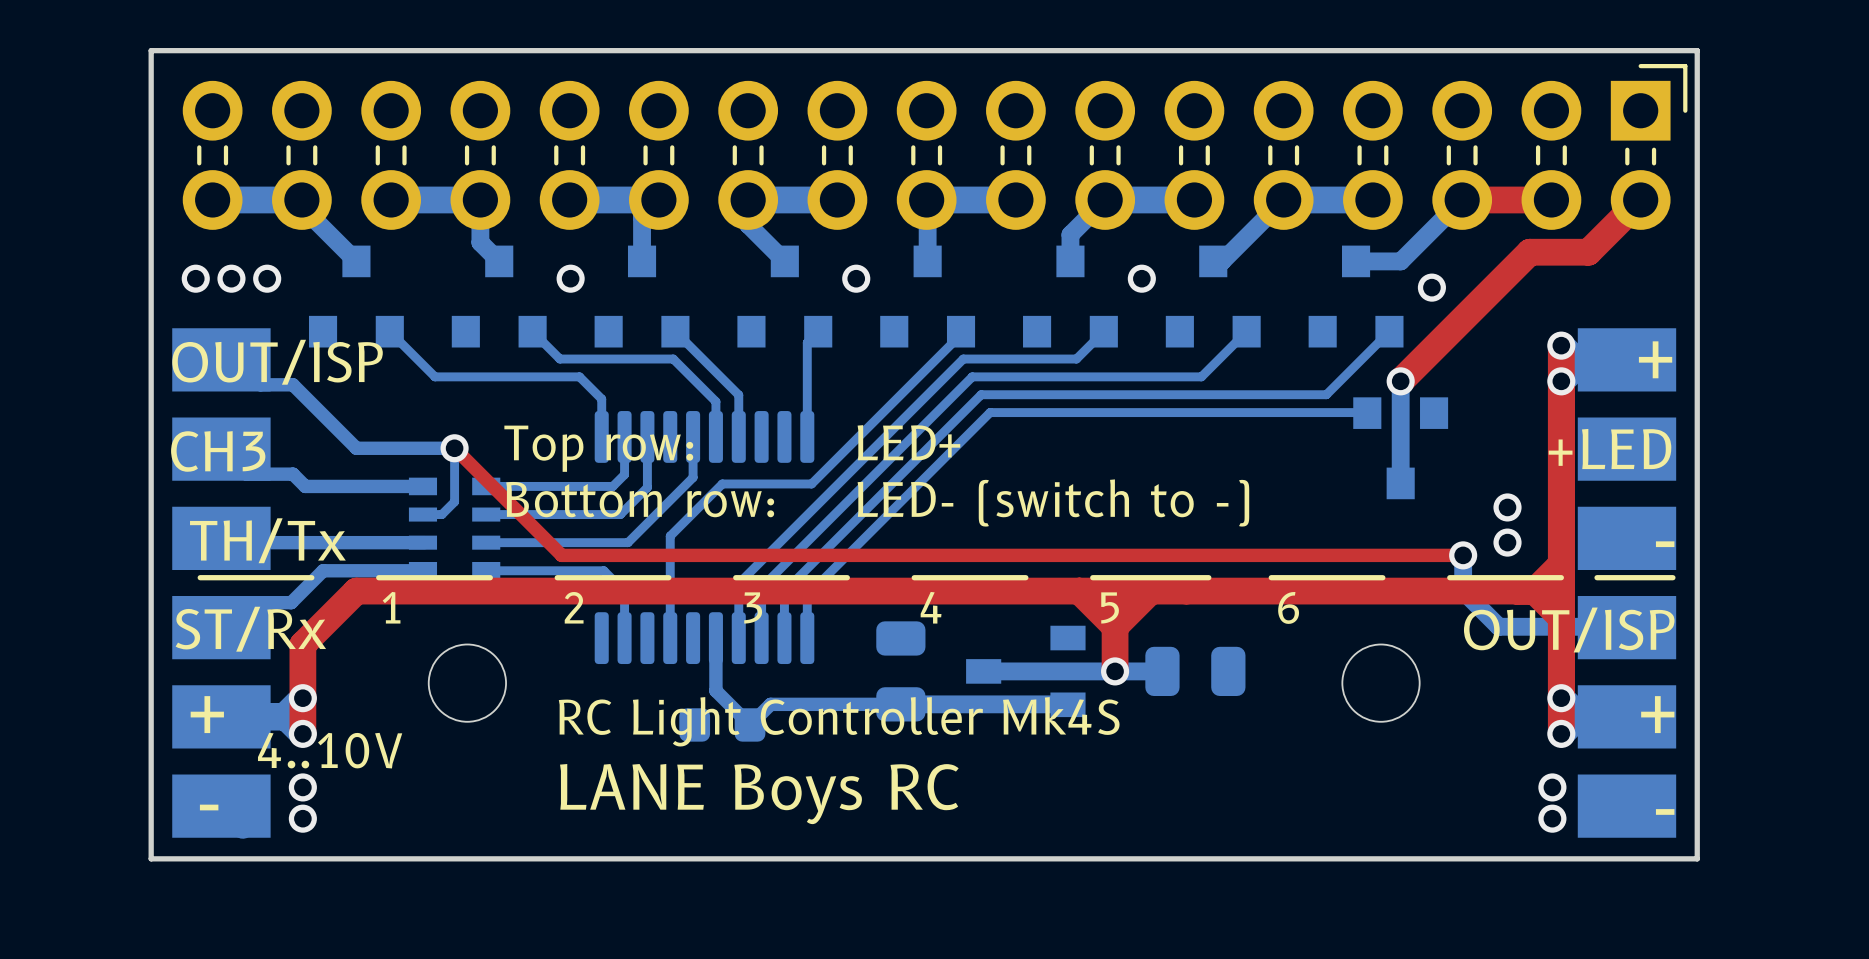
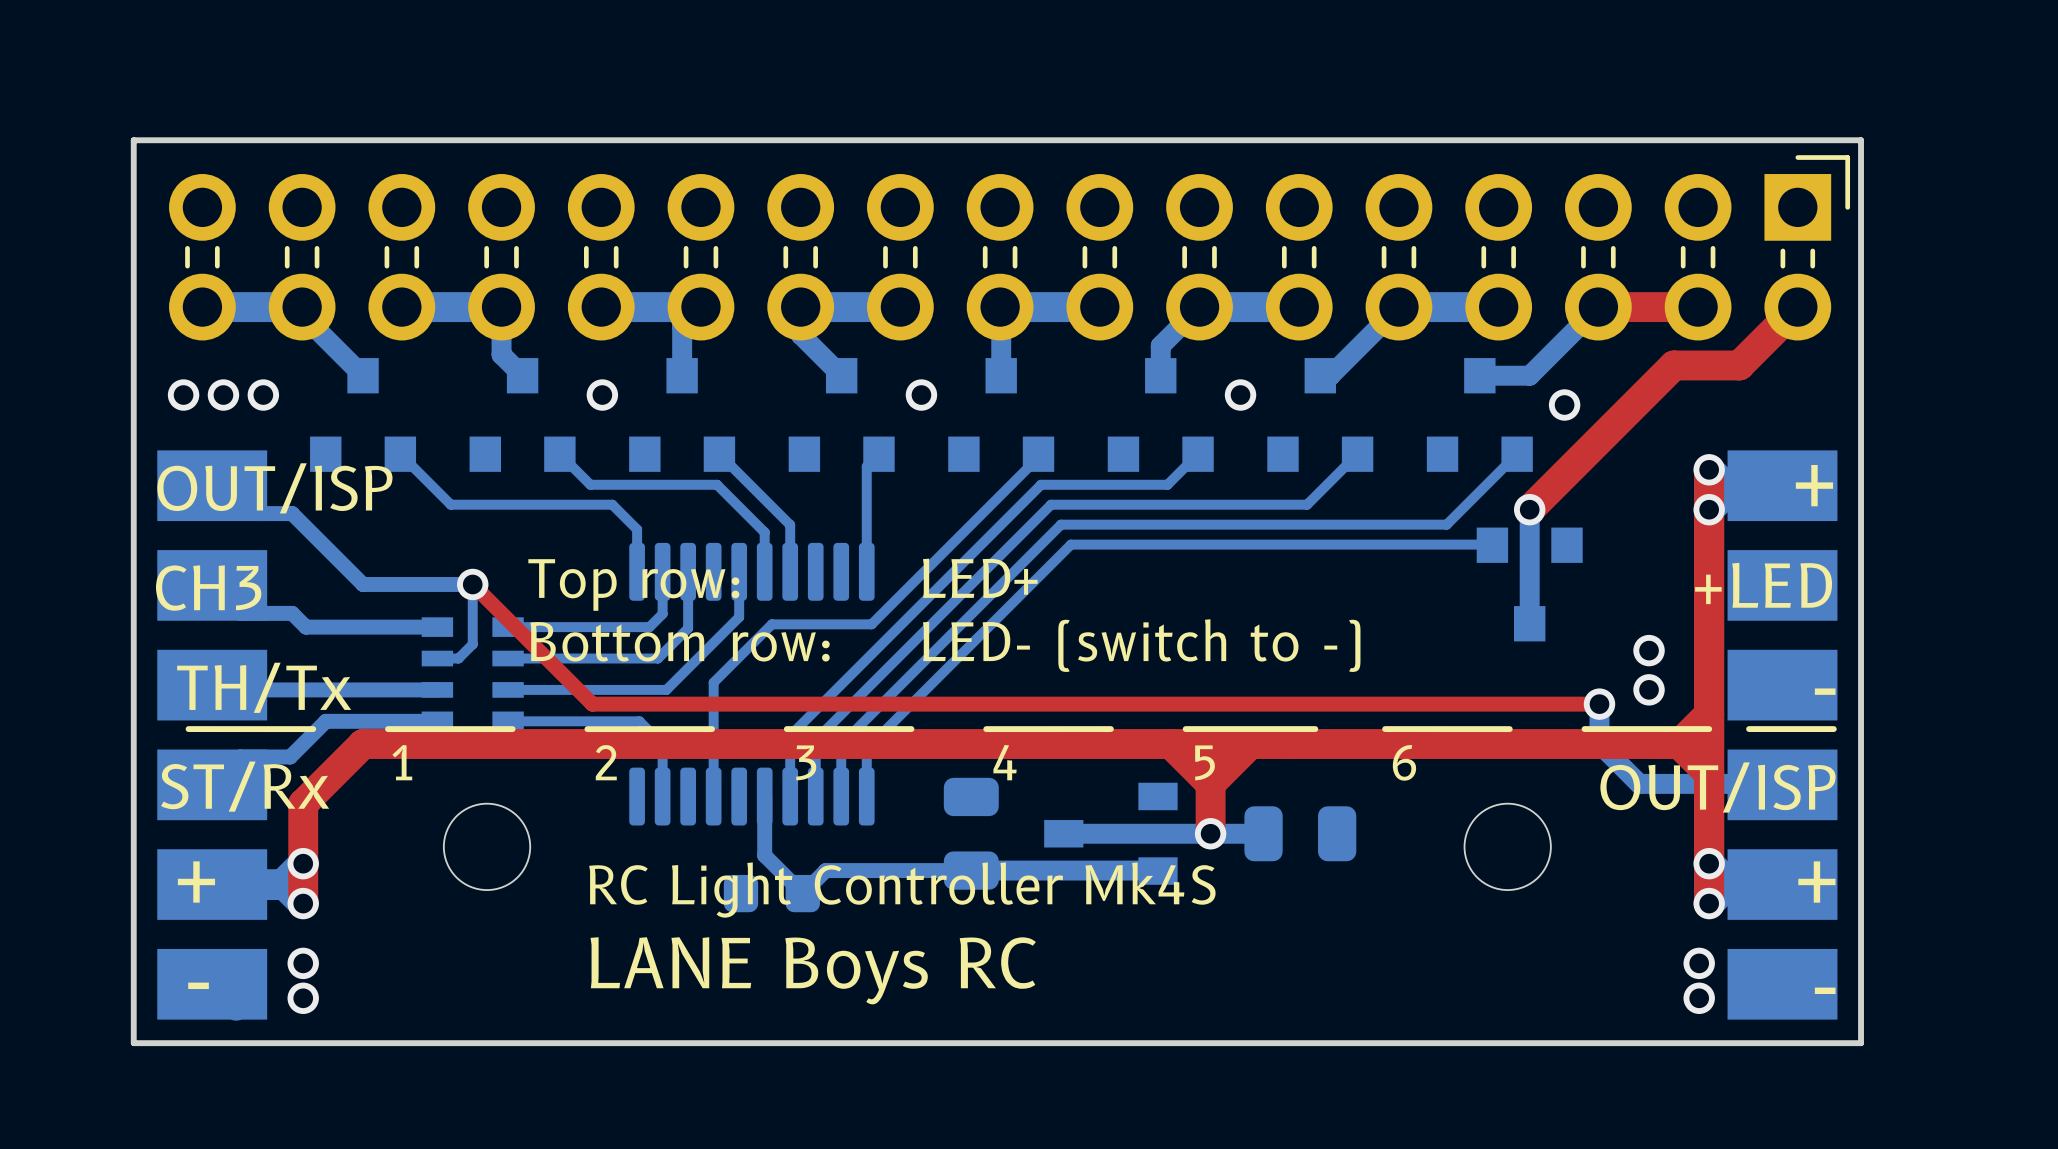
text: 4..10V (330, 750) -> none

